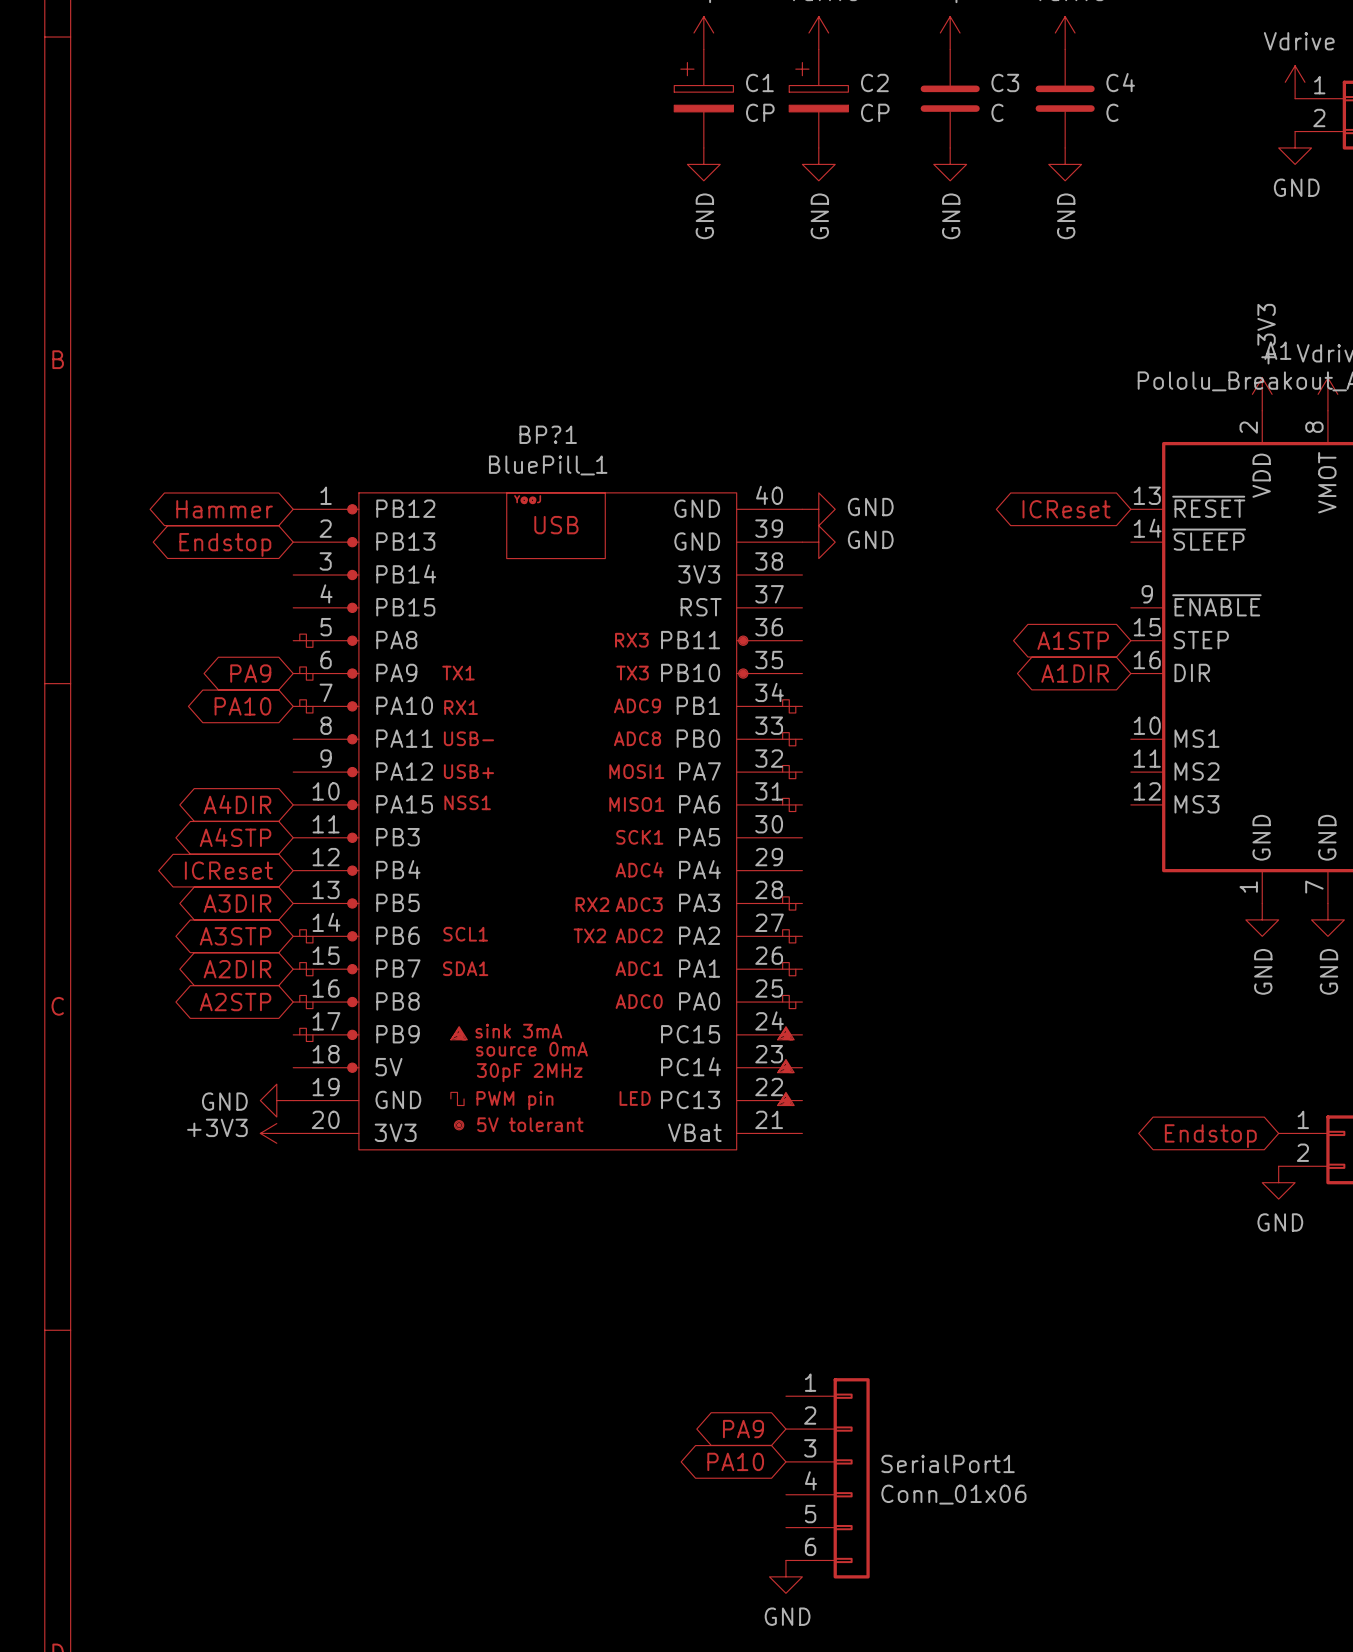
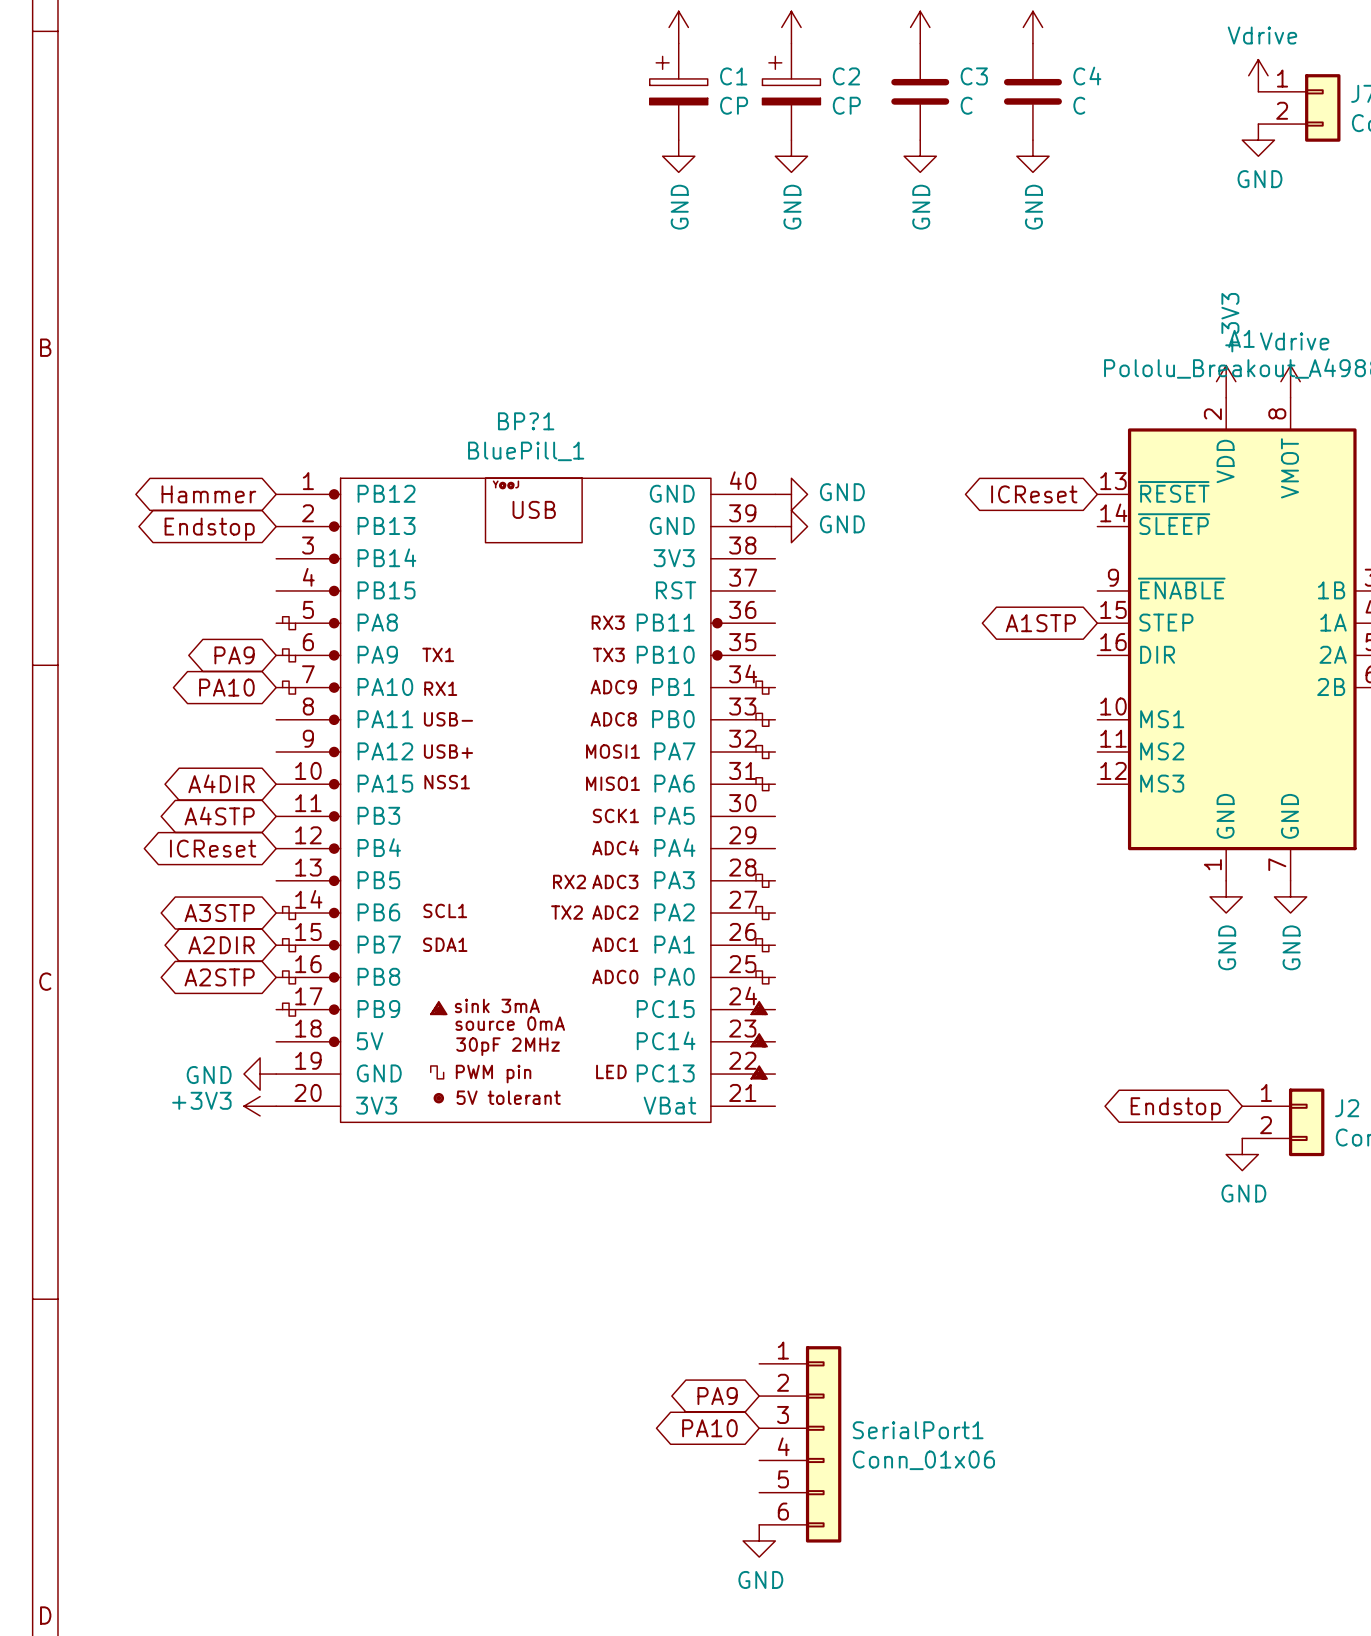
global label: A1DIR (1075, 673) -> none
global label: A3DIR (237, 903) -> none

